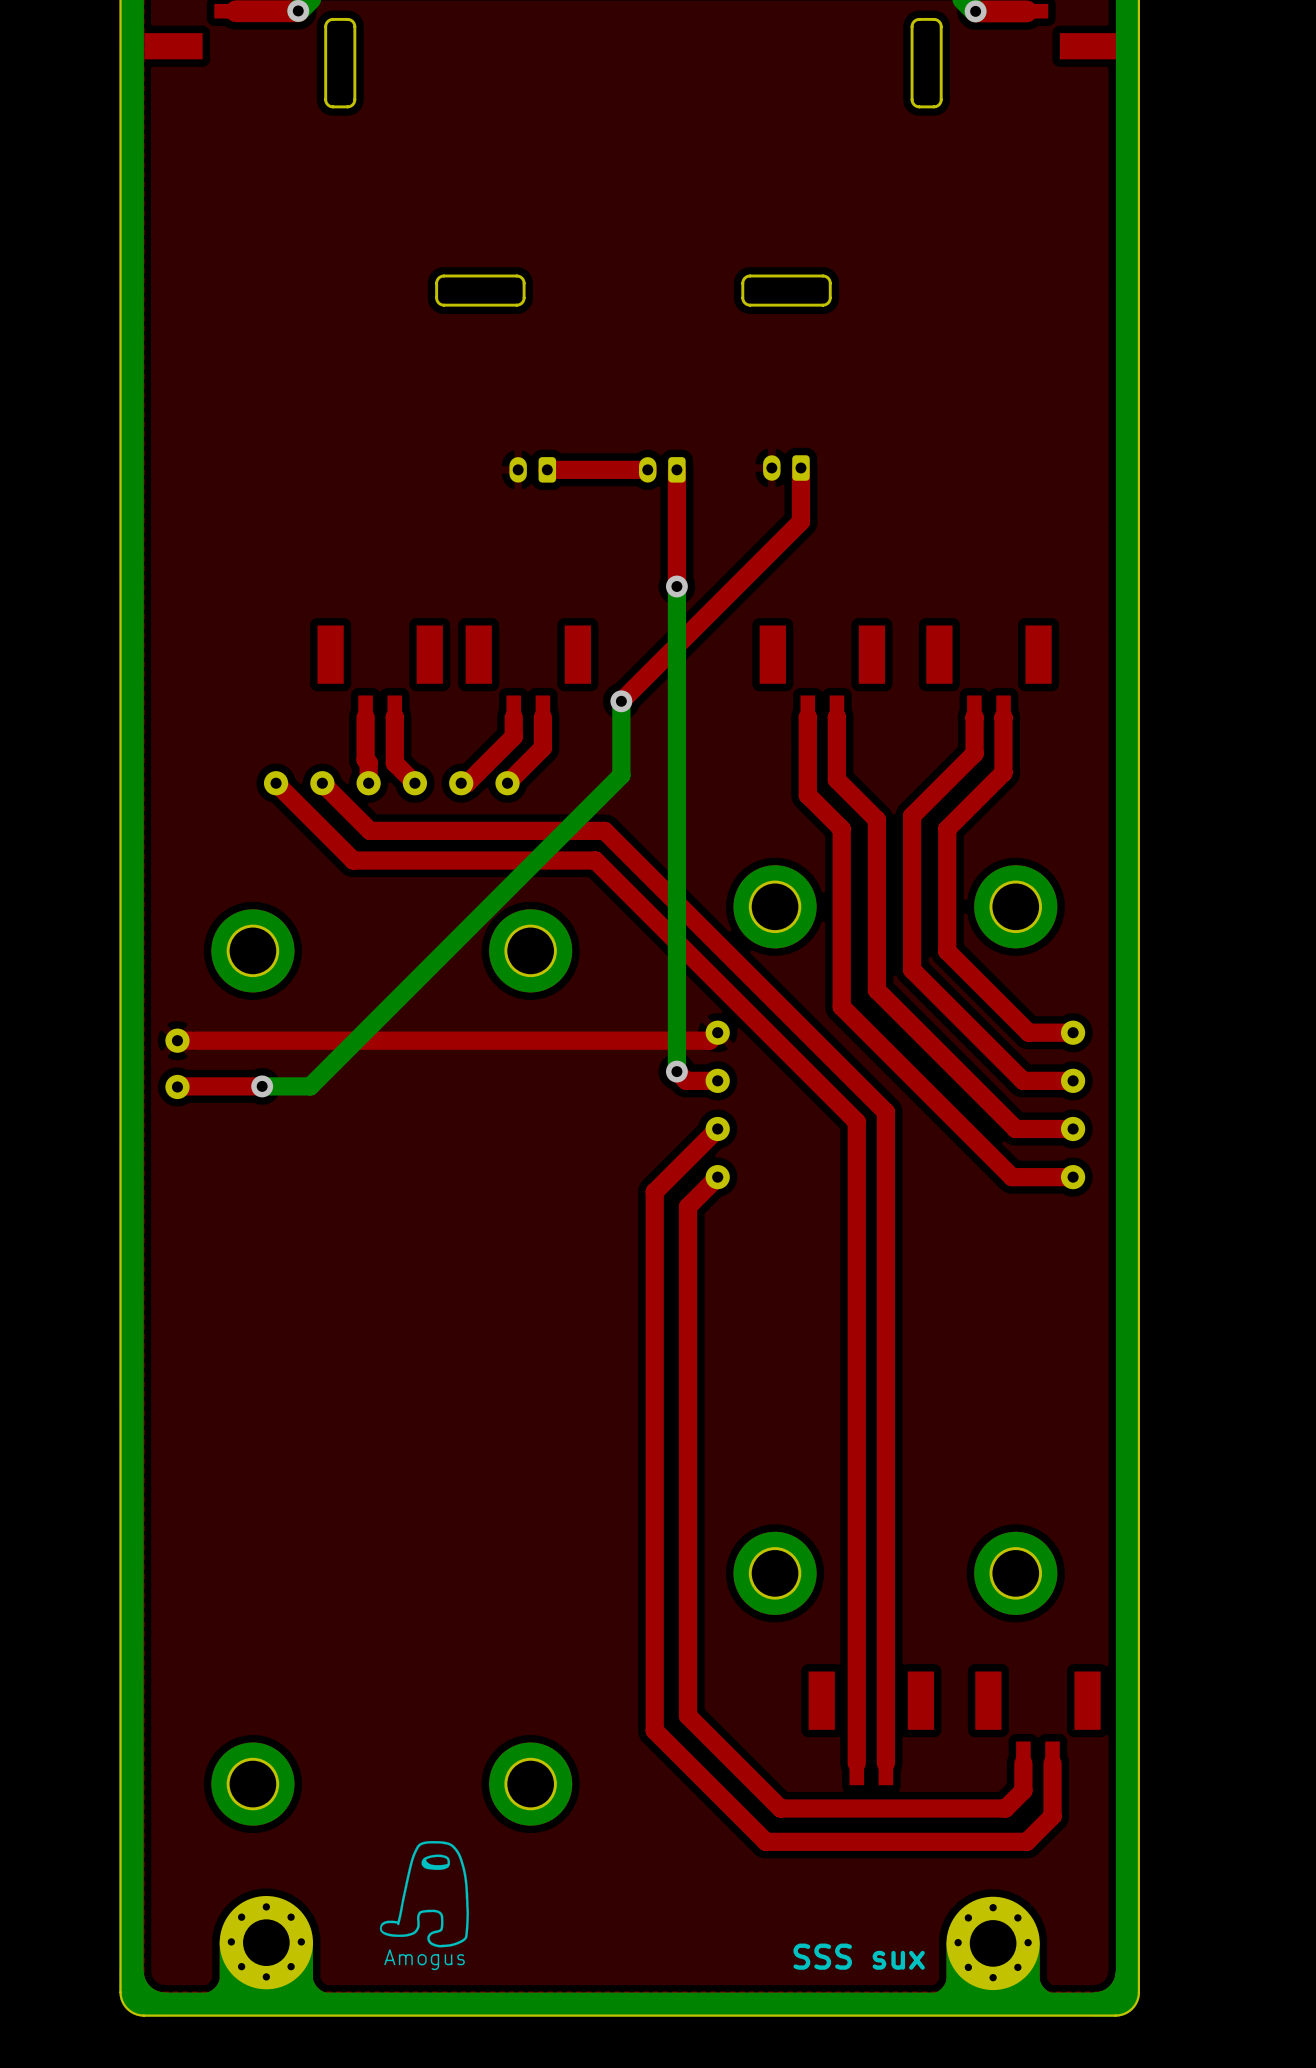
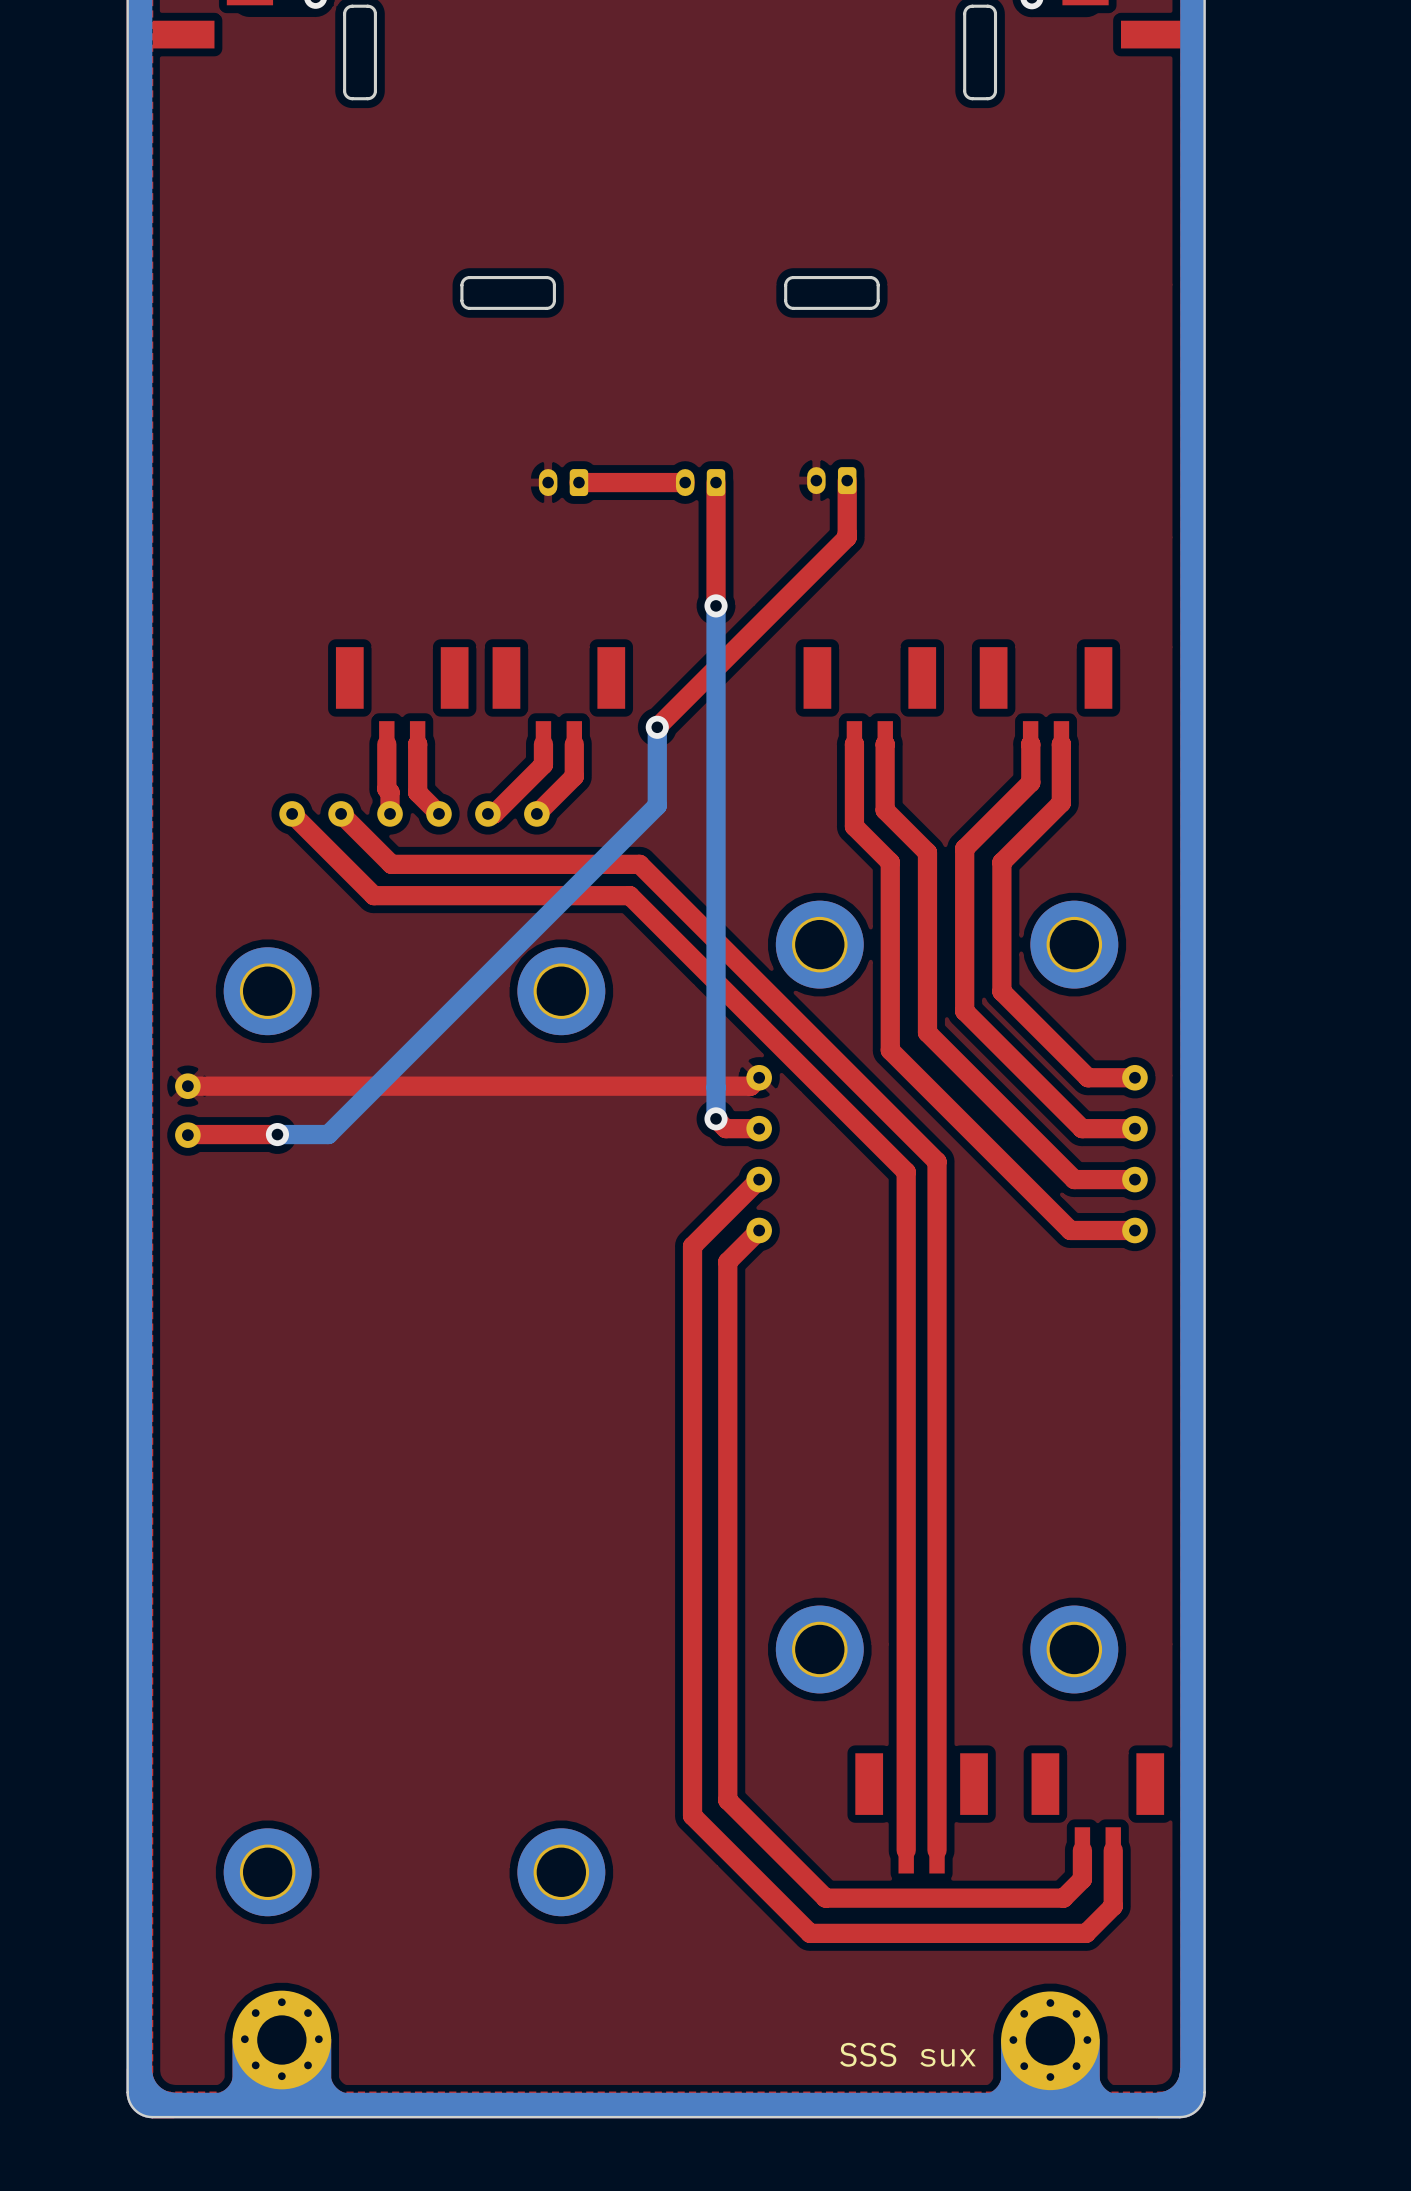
drawing: [379, 1841, 469, 1948] -> none
text: Amogus (424, 1959) -> none

